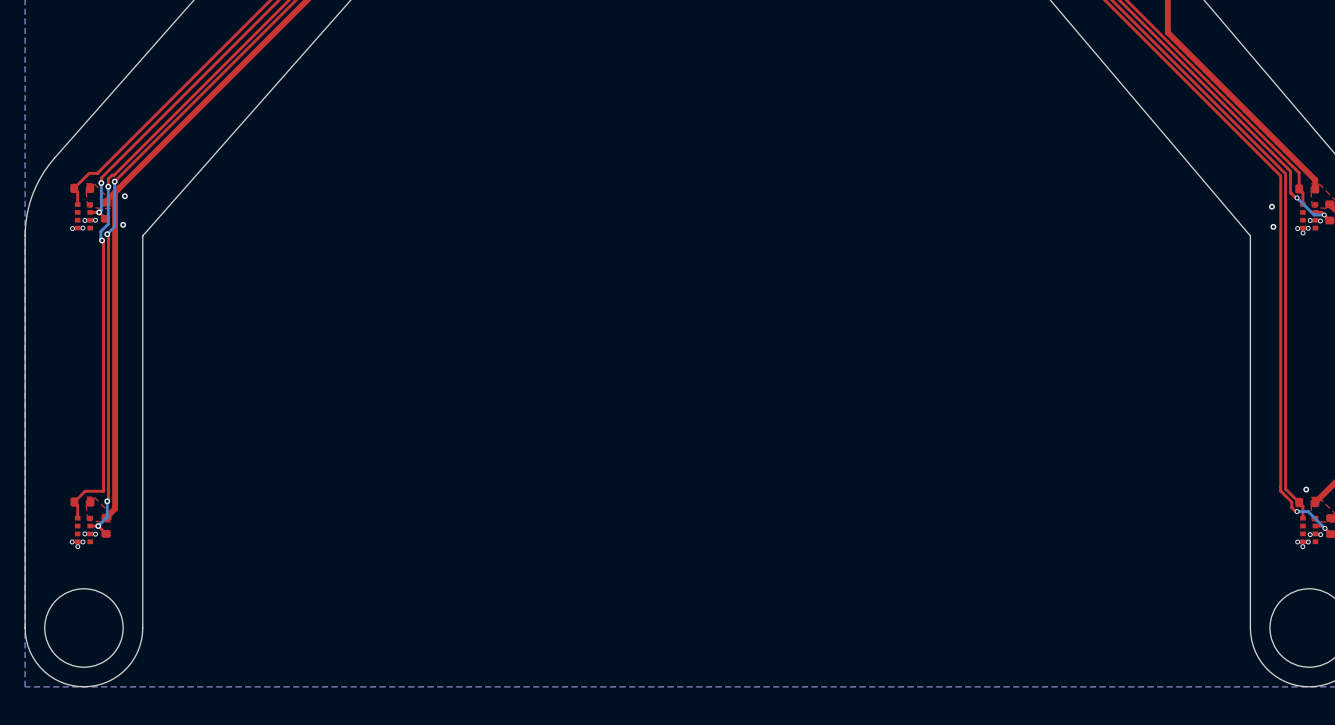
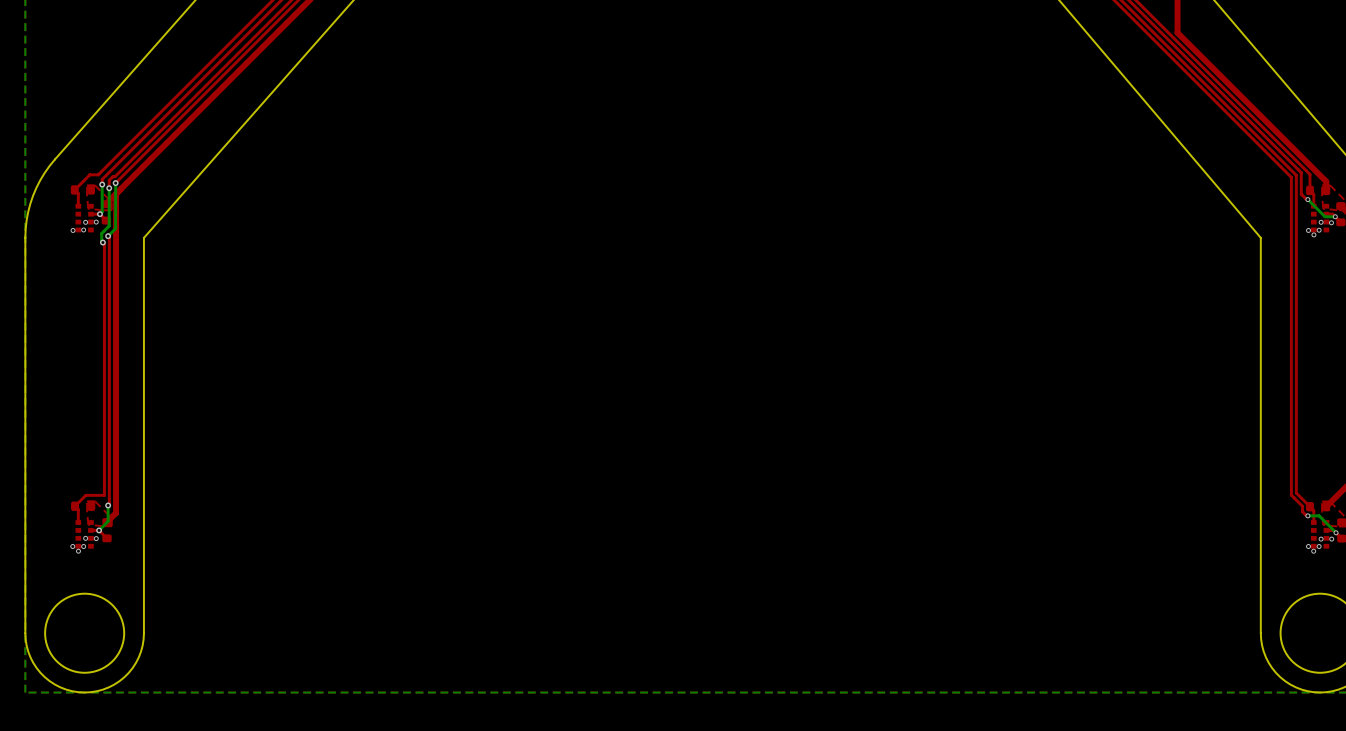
via: (124, 196) -> none
via: (1271, 206) -> none
via: (123, 224) -> none
via: (1273, 226) -> none
via: (1306, 489) -> none

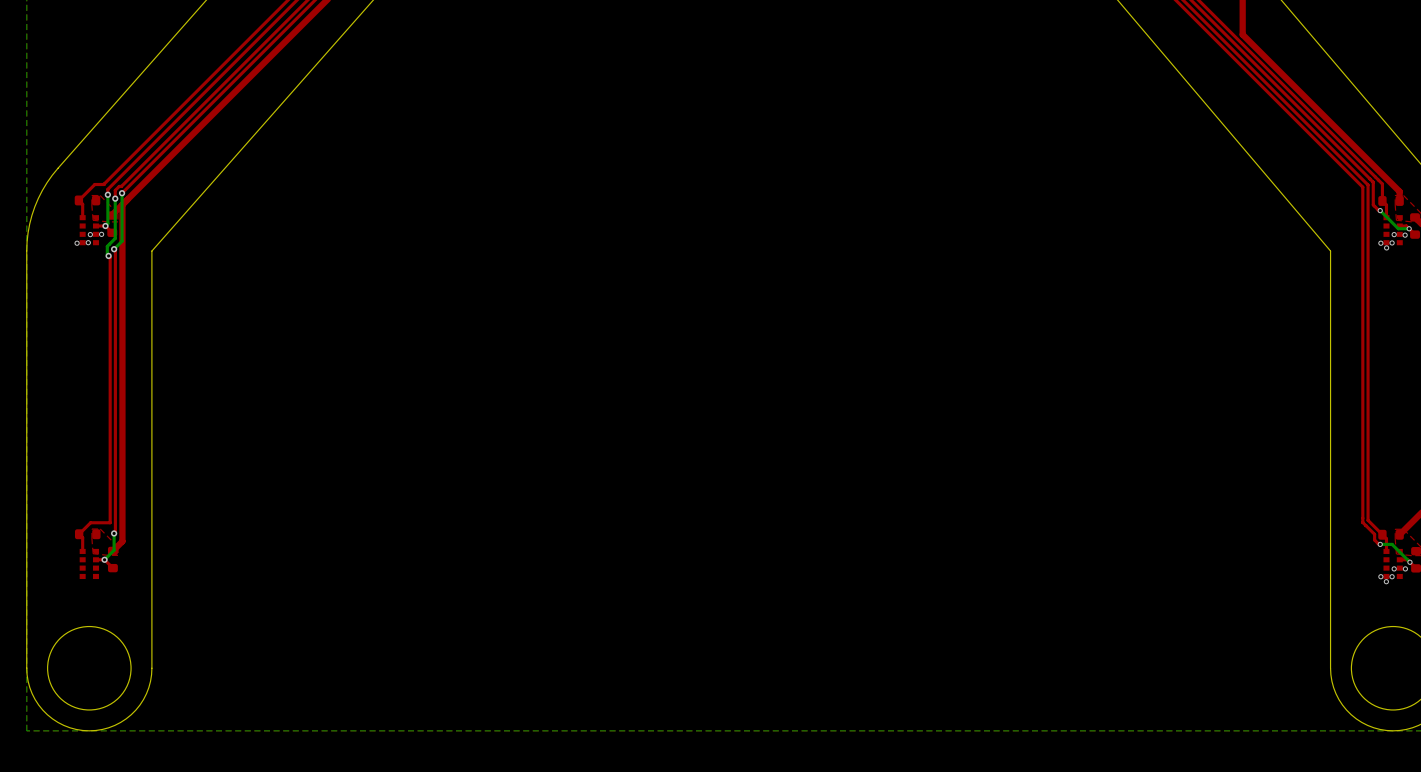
via: (85, 538) -> none
via: (96, 538) -> none
via: (72, 546) -> none
via: (83, 546) -> none
via: (78, 551) -> none

